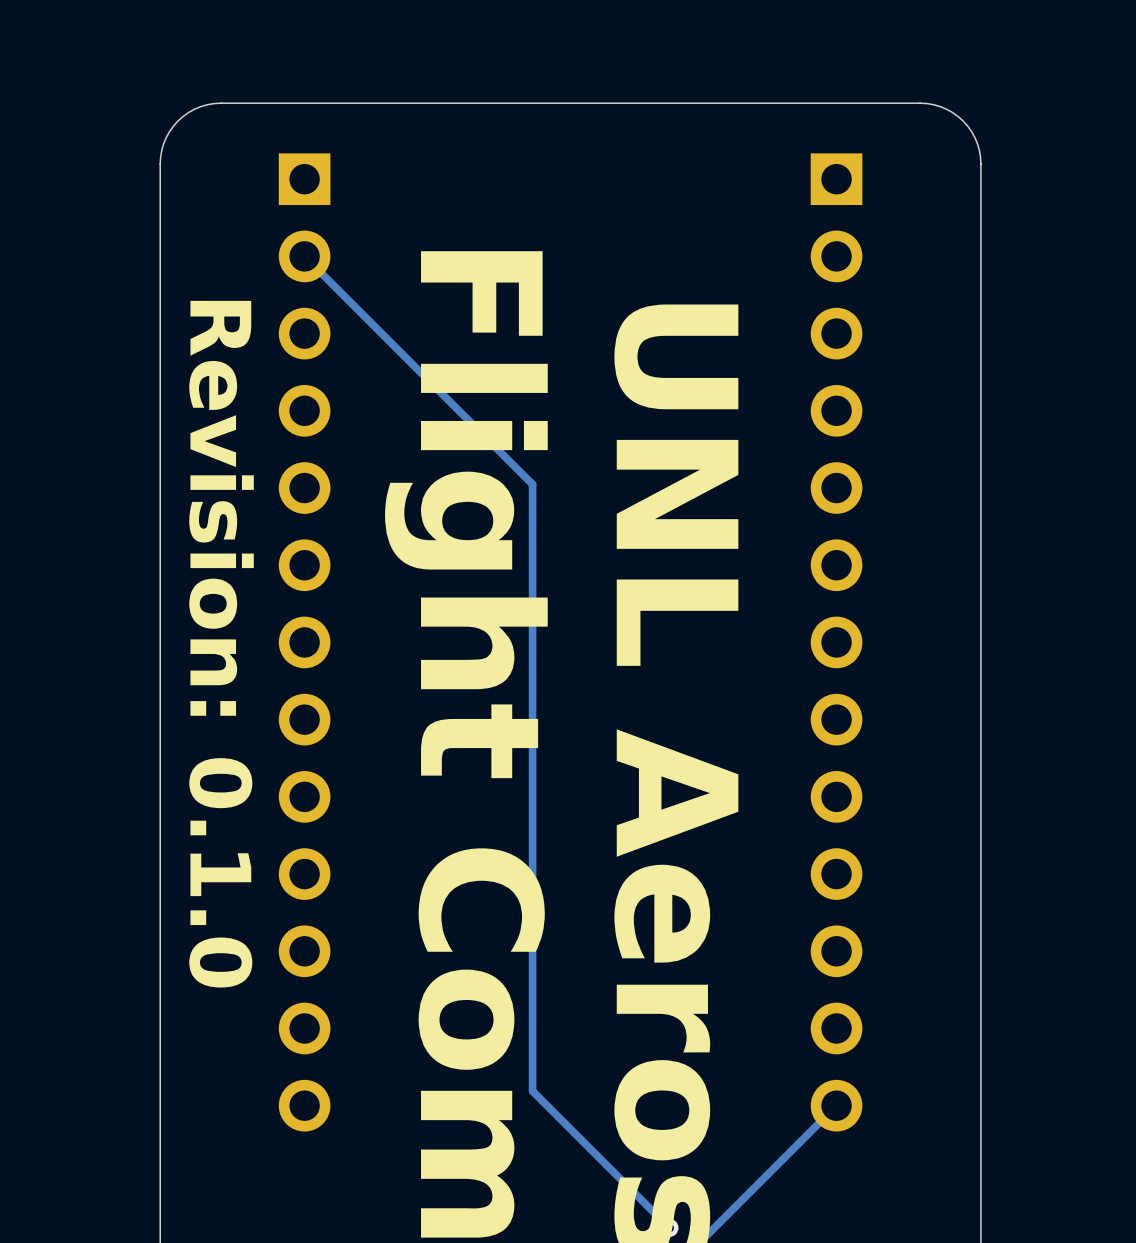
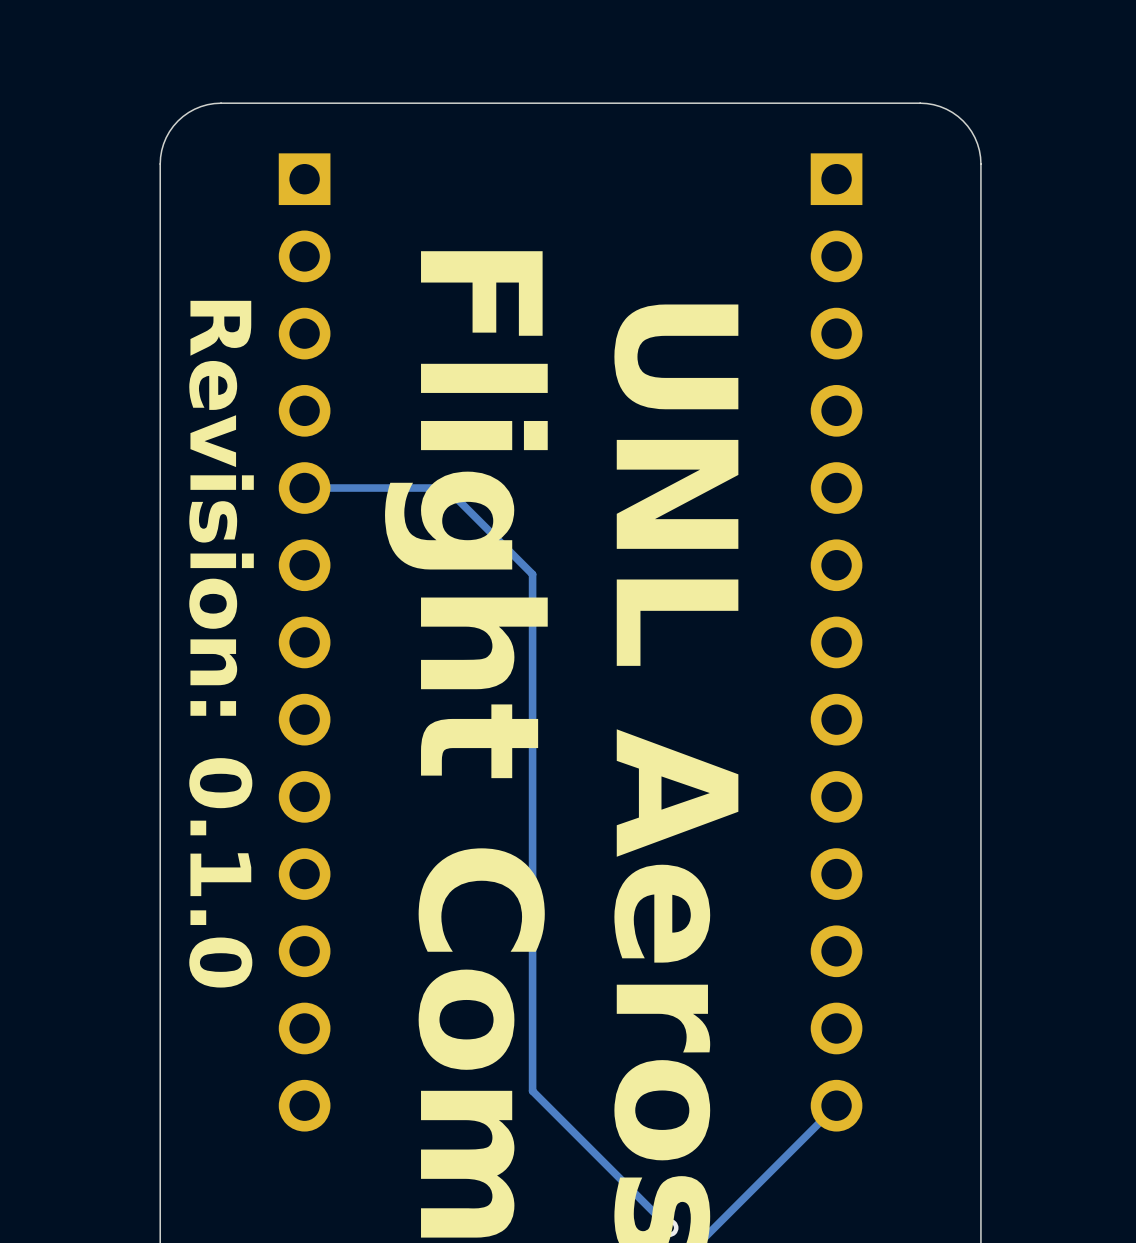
track: (304, 256) (532, 484) (532, 574) -> (304, 488) (446, 488) (532, 574)

